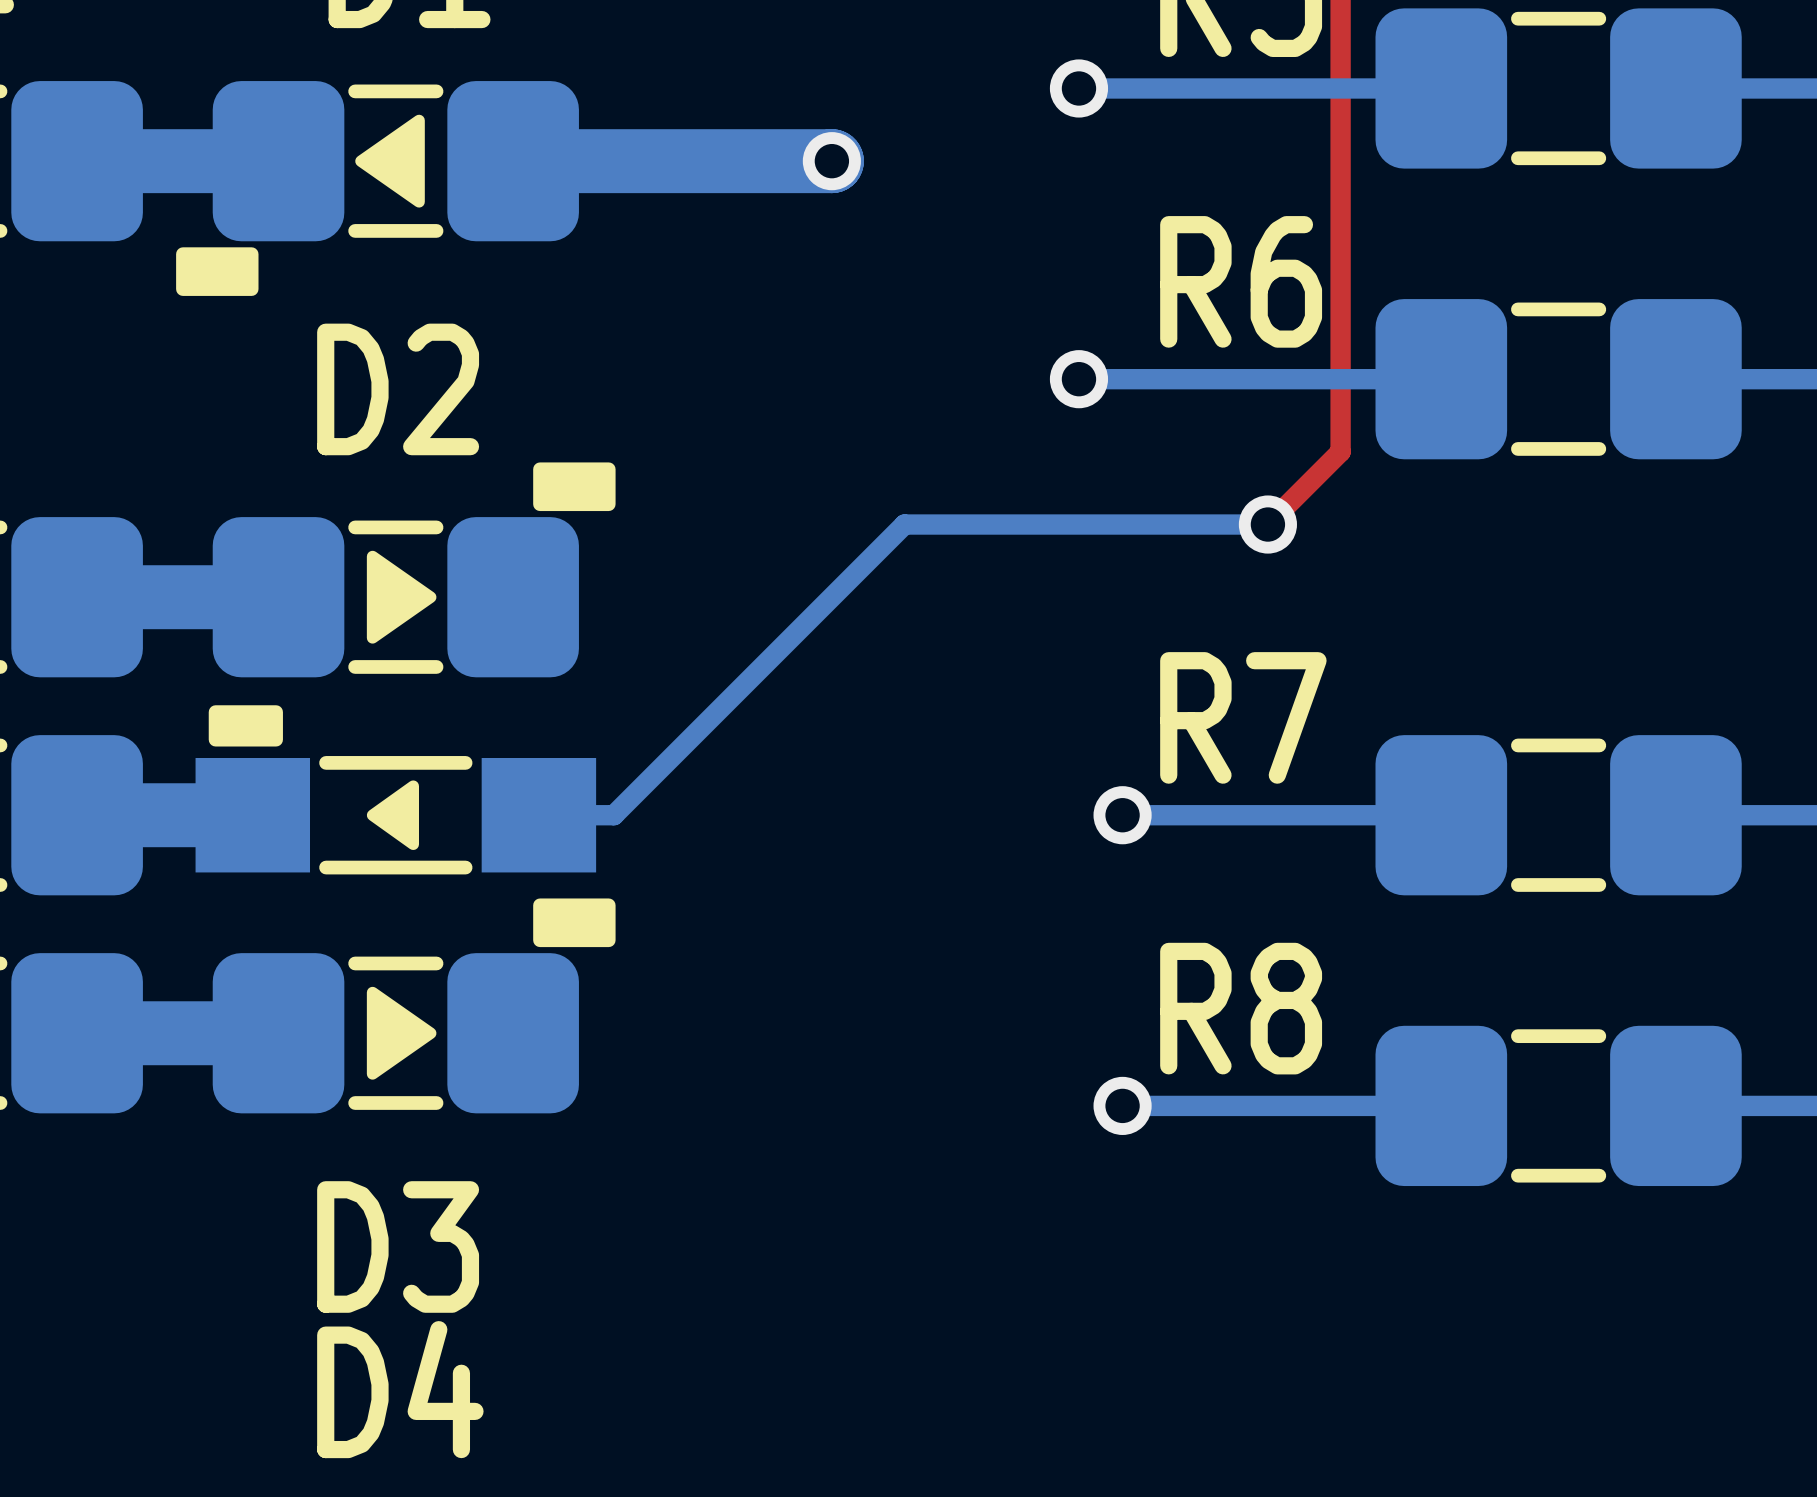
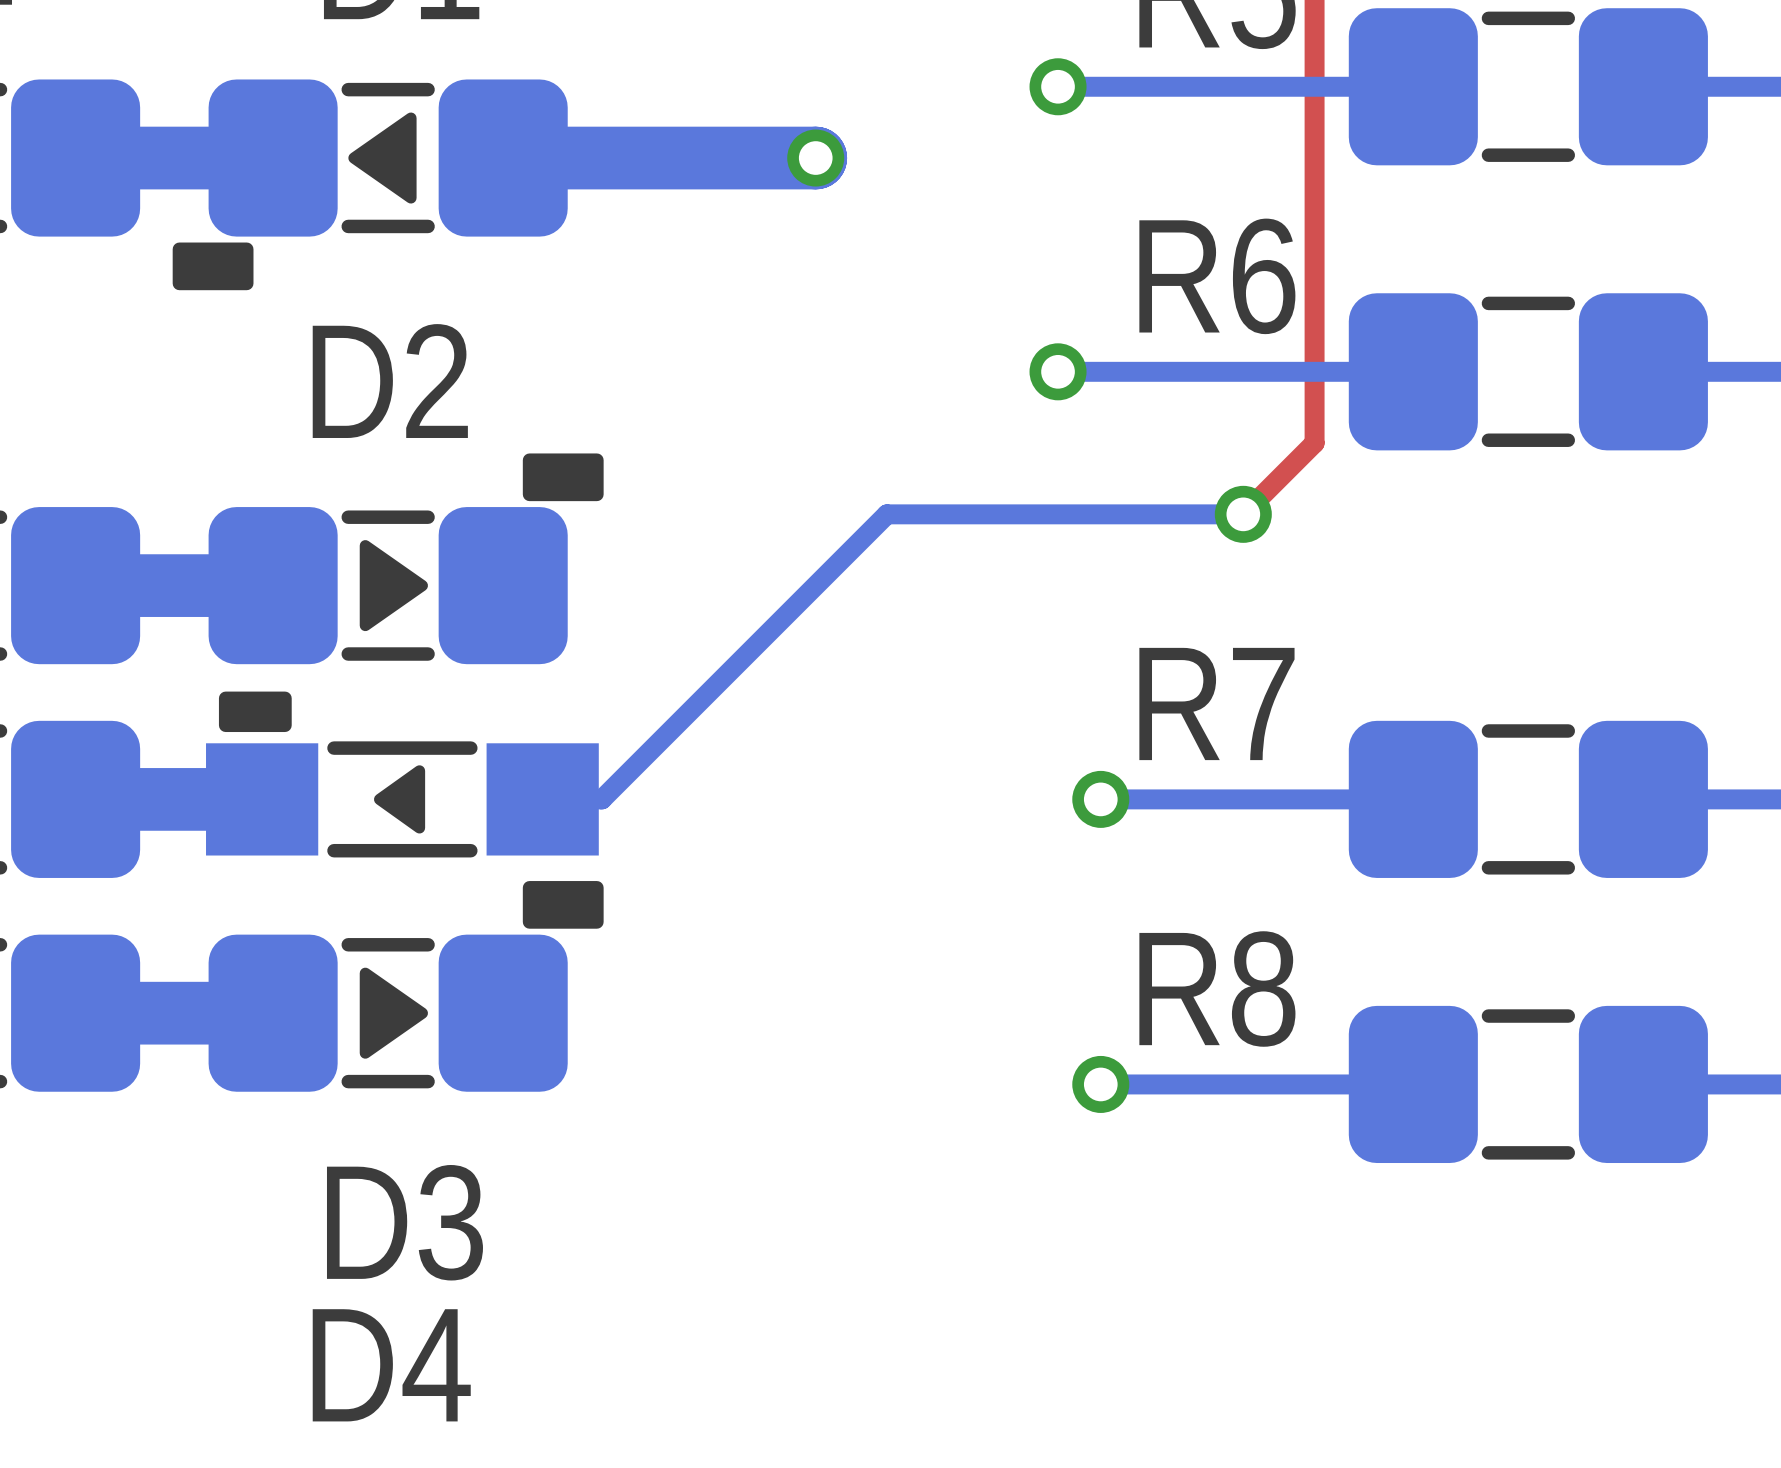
D3 position: (395, 789) -> (402, 774)

